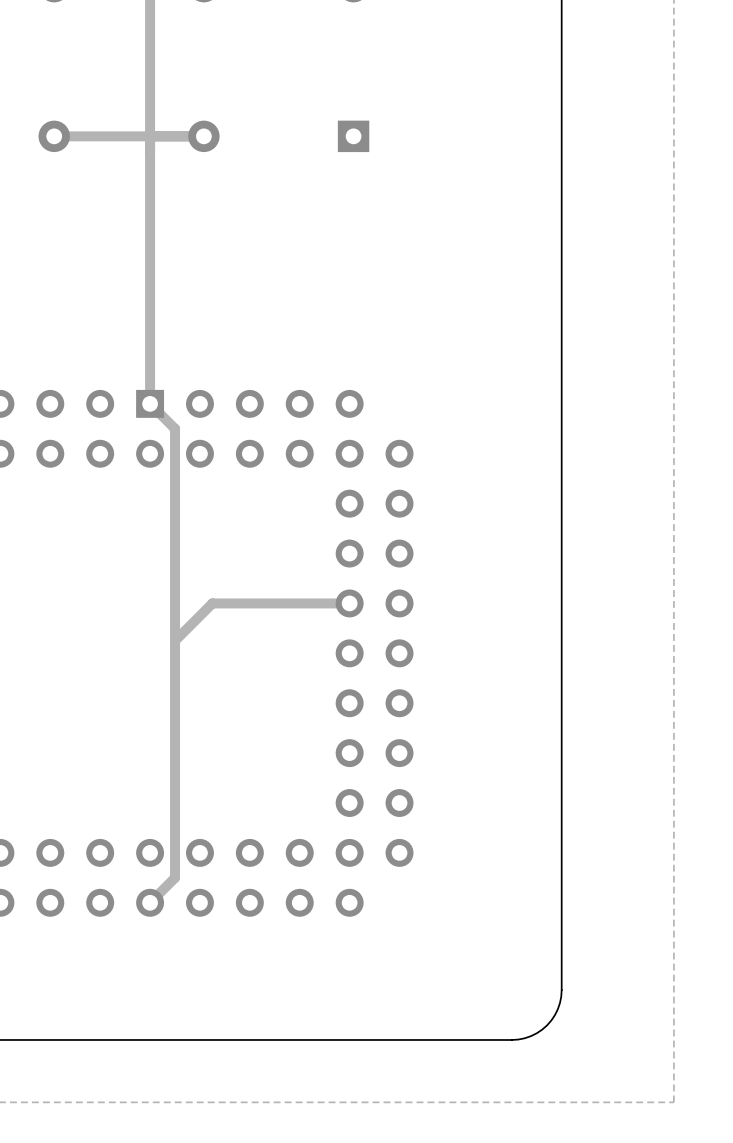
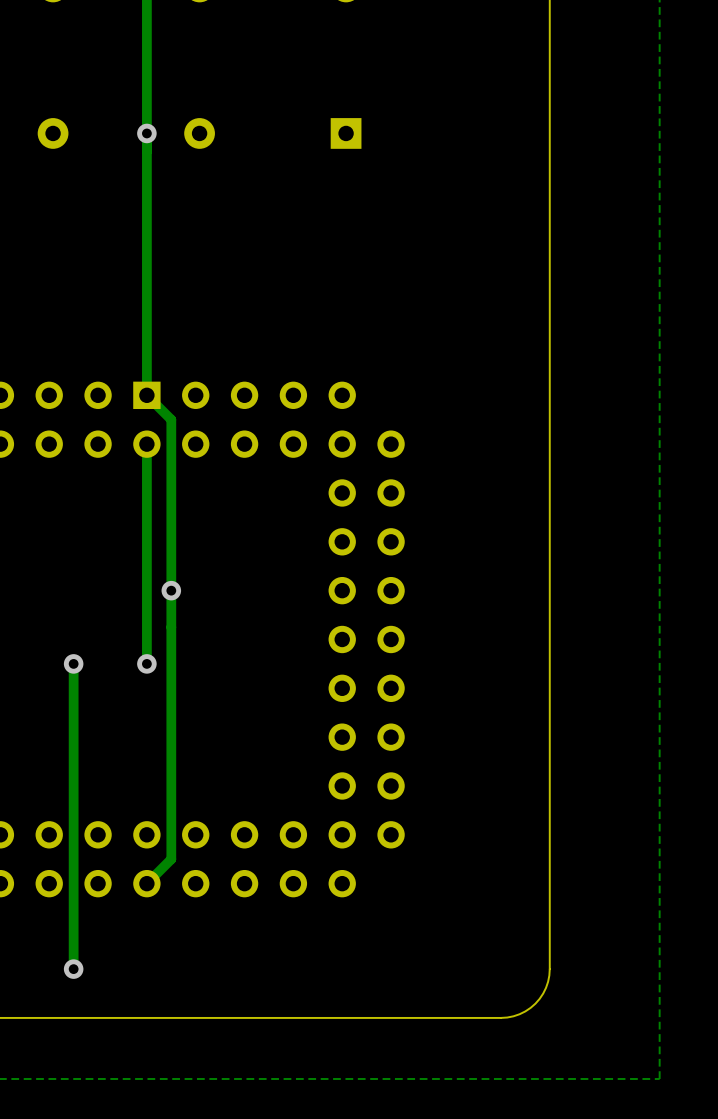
via: none -> (146, 133)
track: (203, 136) (54, 136) -> none
track: none -> (146, 444) (146, 663)
via: none -> (171, 590)
track: (349, 603) (212, 603) (175, 640) -> none
track: none -> (73, 663) (73, 969)
via: none -> (73, 663)
via: none -> (146, 663)
via: none -> (73, 969)

